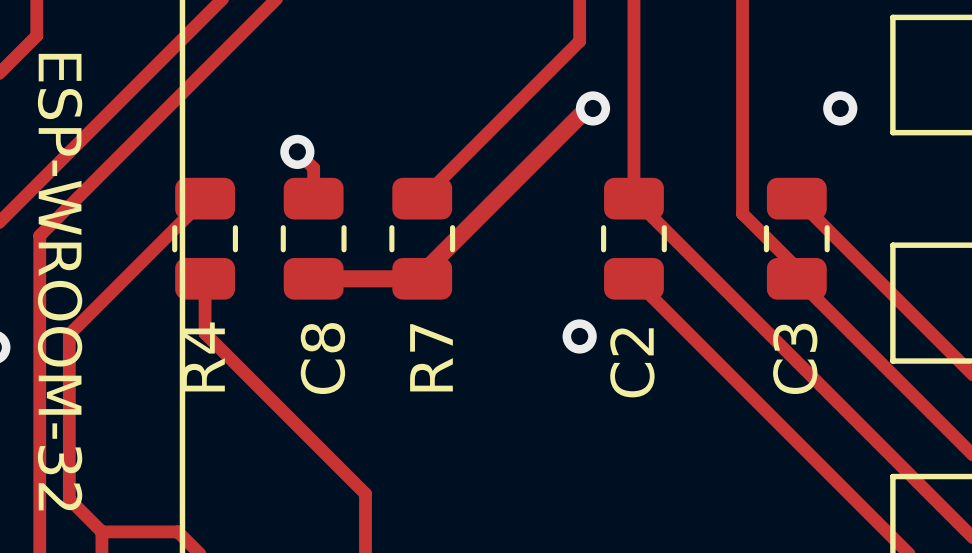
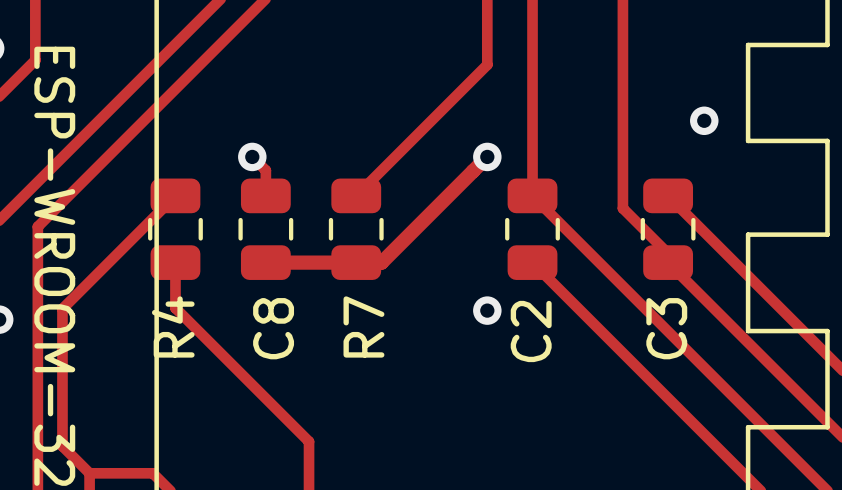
track: (592, 108) (587, 108) (416, 278) -> (487, 156) (381, 262) (351, 262)
via position: (592, 108) -> (487, 156)

